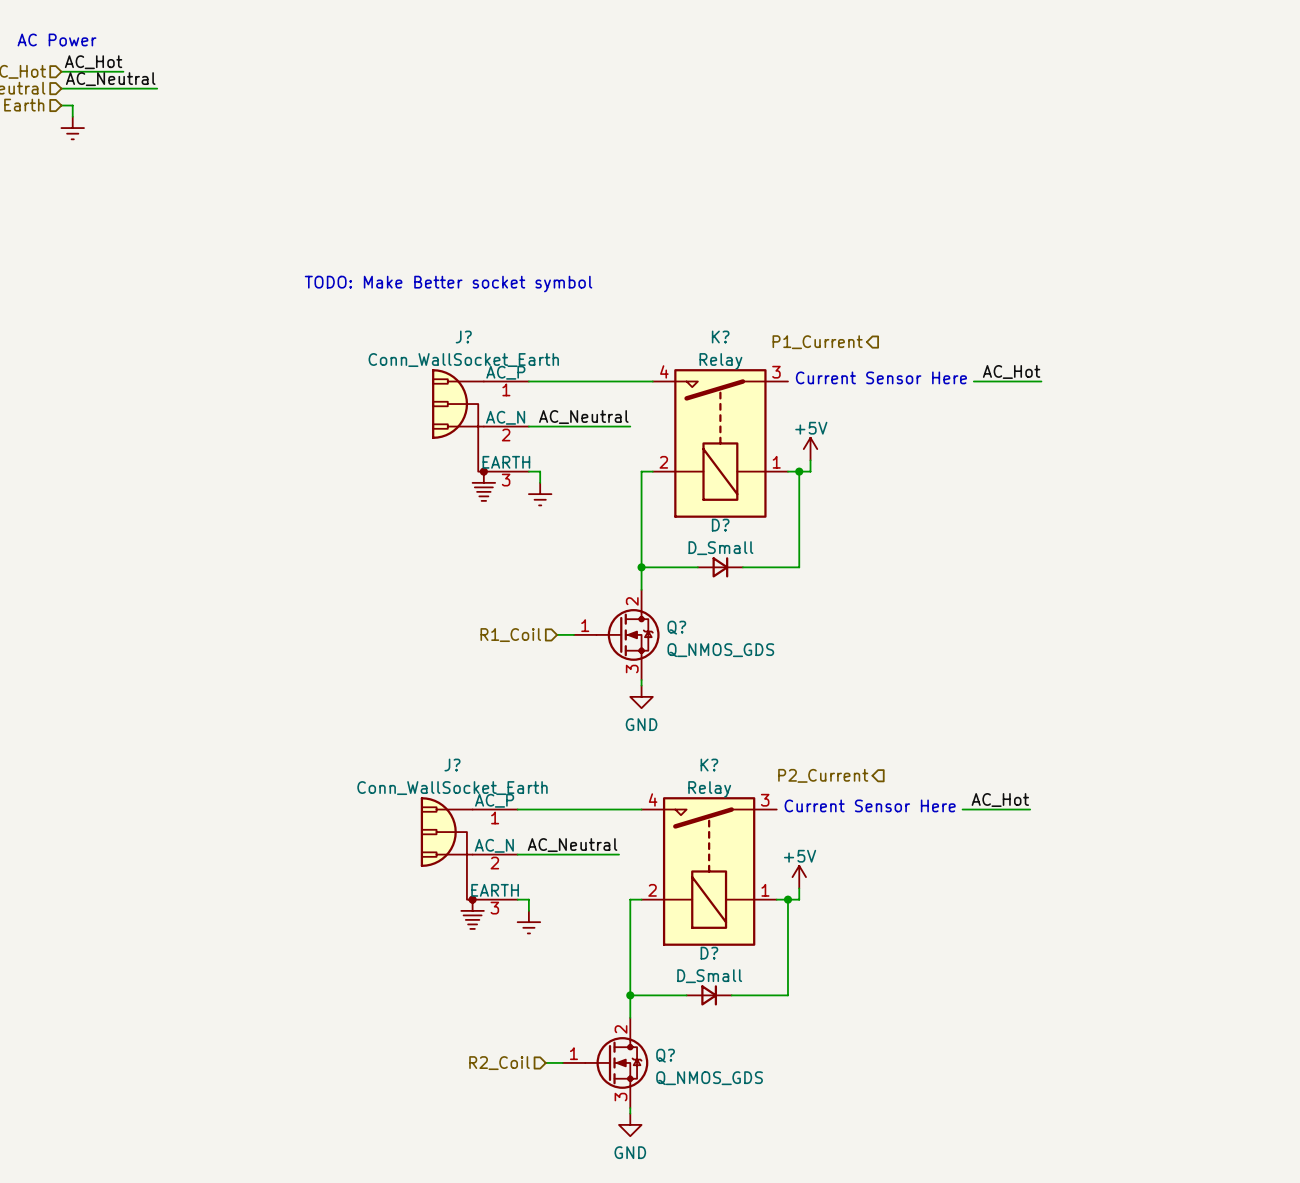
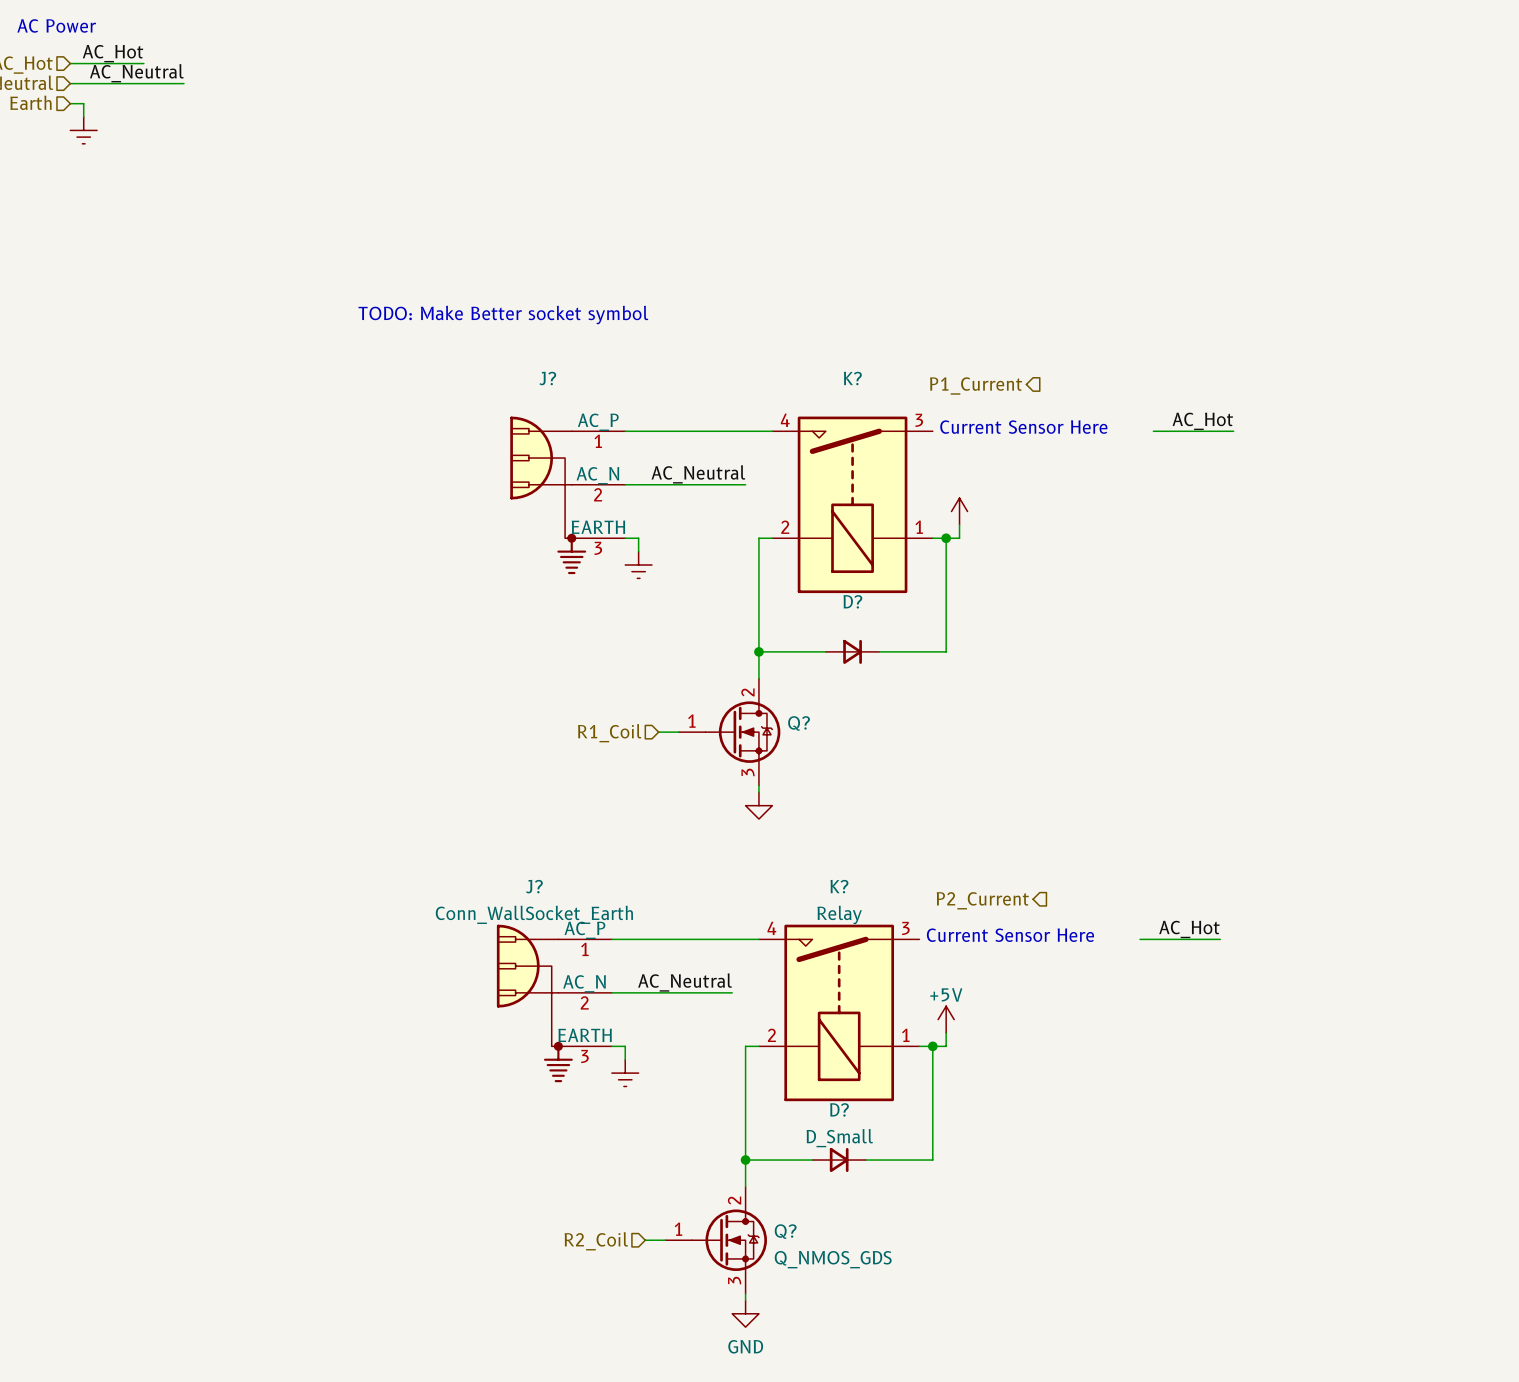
J? value: Conn_WallSocket_Earth (463, 360) -> none
K? value: Relay (720, 361) -> none
power symbol text: +5V (811, 428) -> none
D? value: D_Small (720, 548) -> none
Q? value: Q_NMOS_GDS (720, 650) -> none
power symbol text: GND (641, 724) -> none

